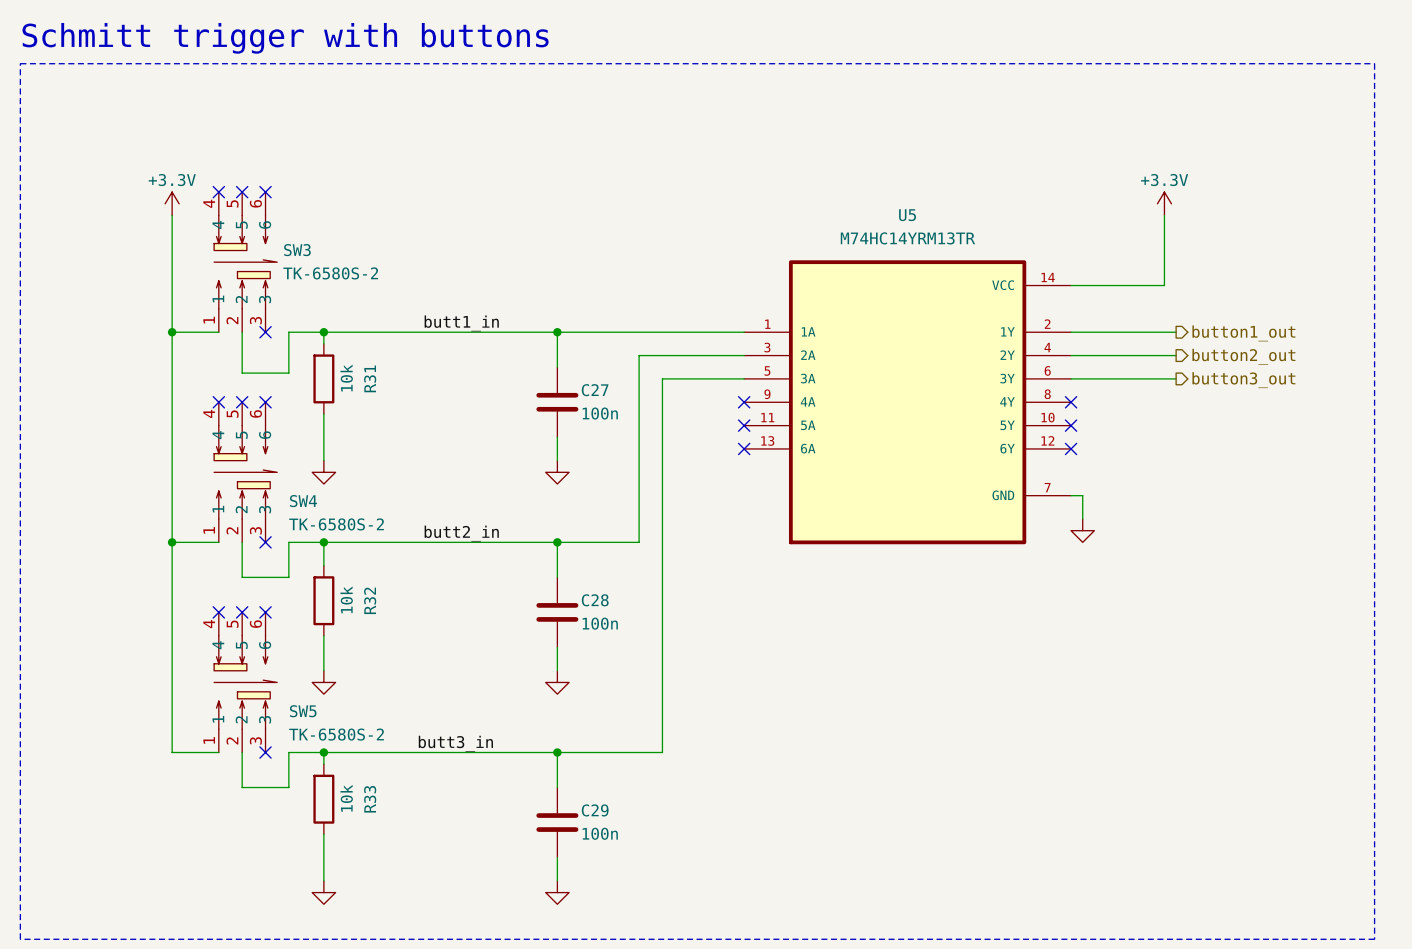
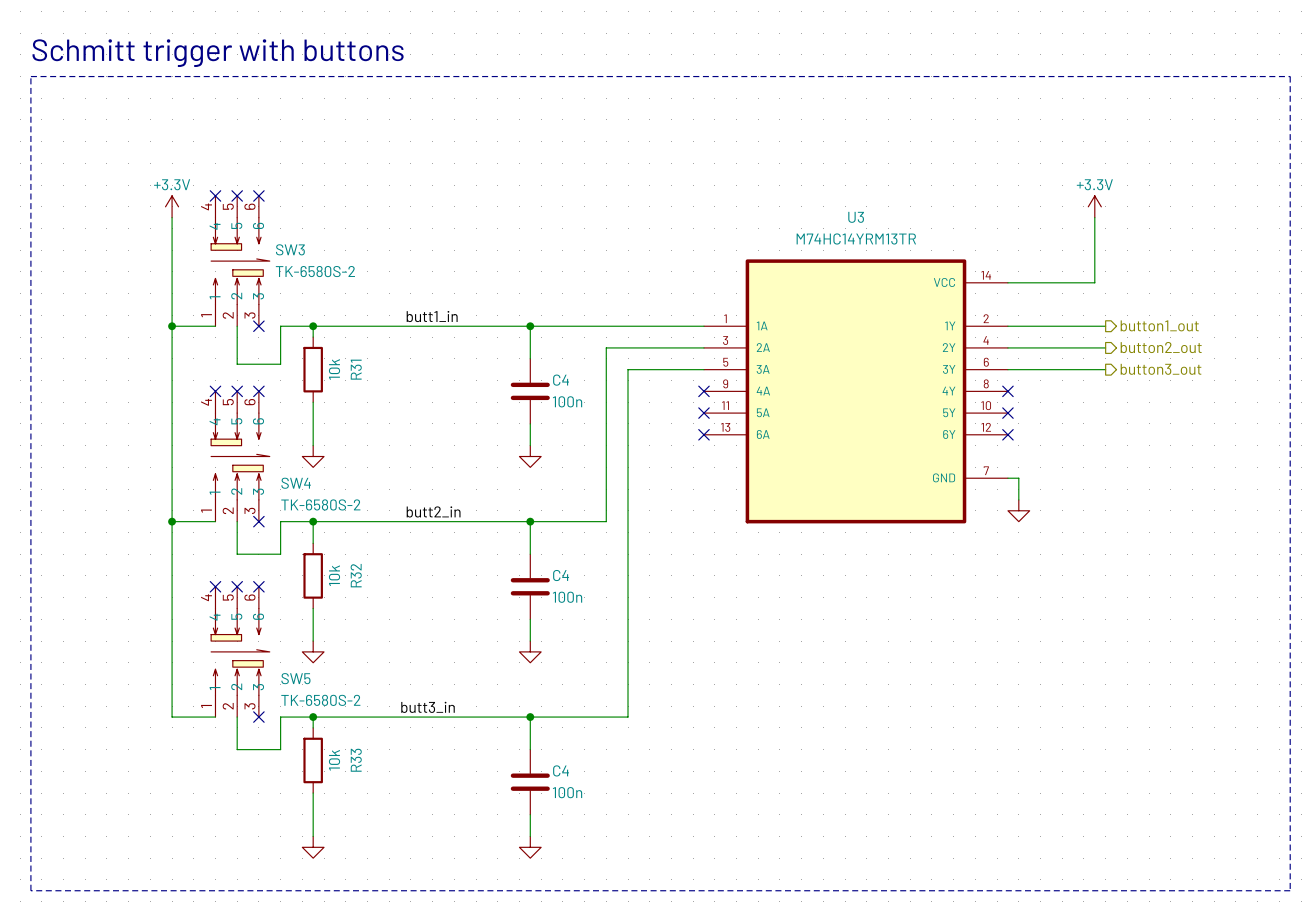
U5 name: U5 (907, 215) -> U3 (856, 217)
C27 name: C27 (595, 390) -> C4 (561, 380)
C28 name: C28 (595, 600) -> C4 (561, 575)
C29 name: C29 (595, 810) -> C4 (561, 770)

